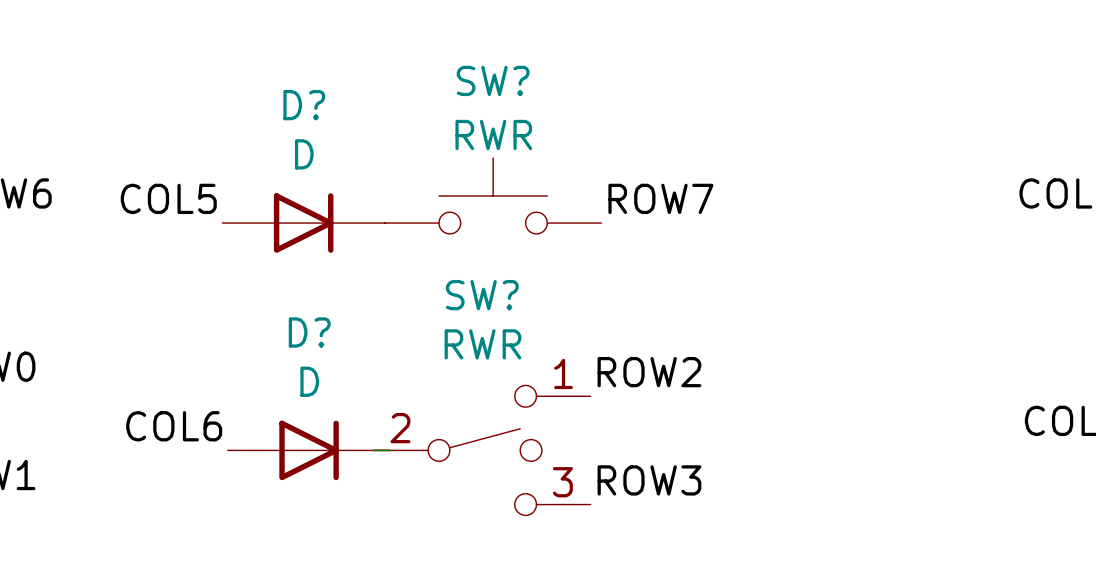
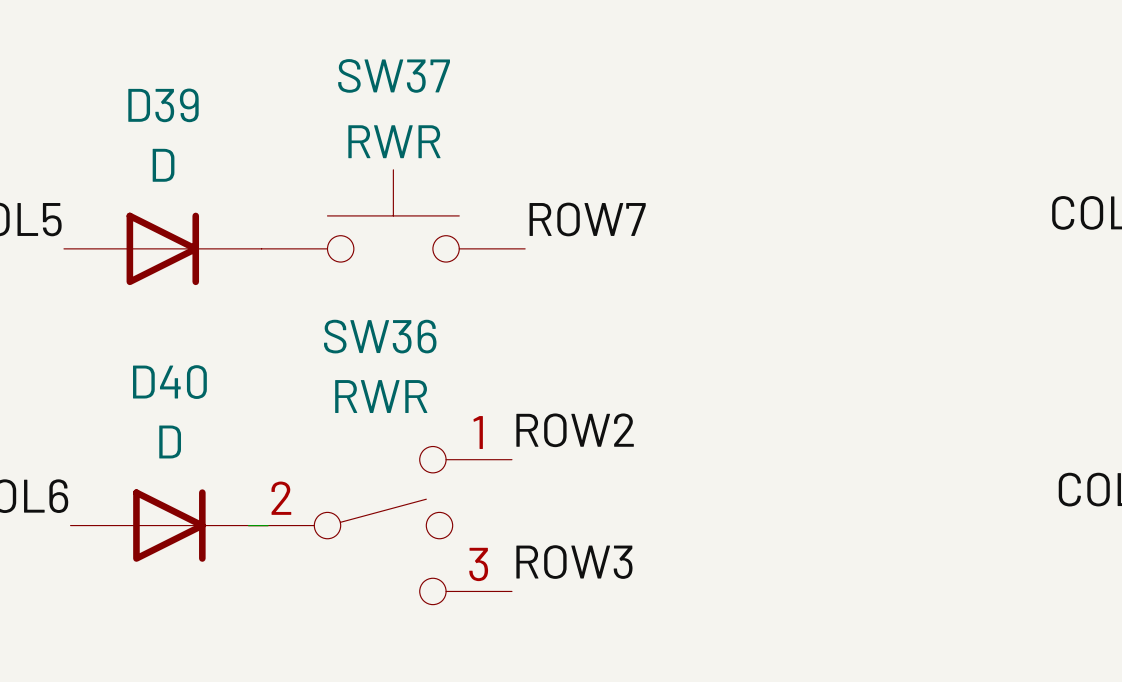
SW? name: SW? (493, 80) -> SW37 (394, 75)
D? name: D? (304, 105) -> D39 (163, 105)
SW? name: SW? (482, 295) -> SW36 (380, 336)
D? name: D? (309, 332) -> D40 (169, 382)

